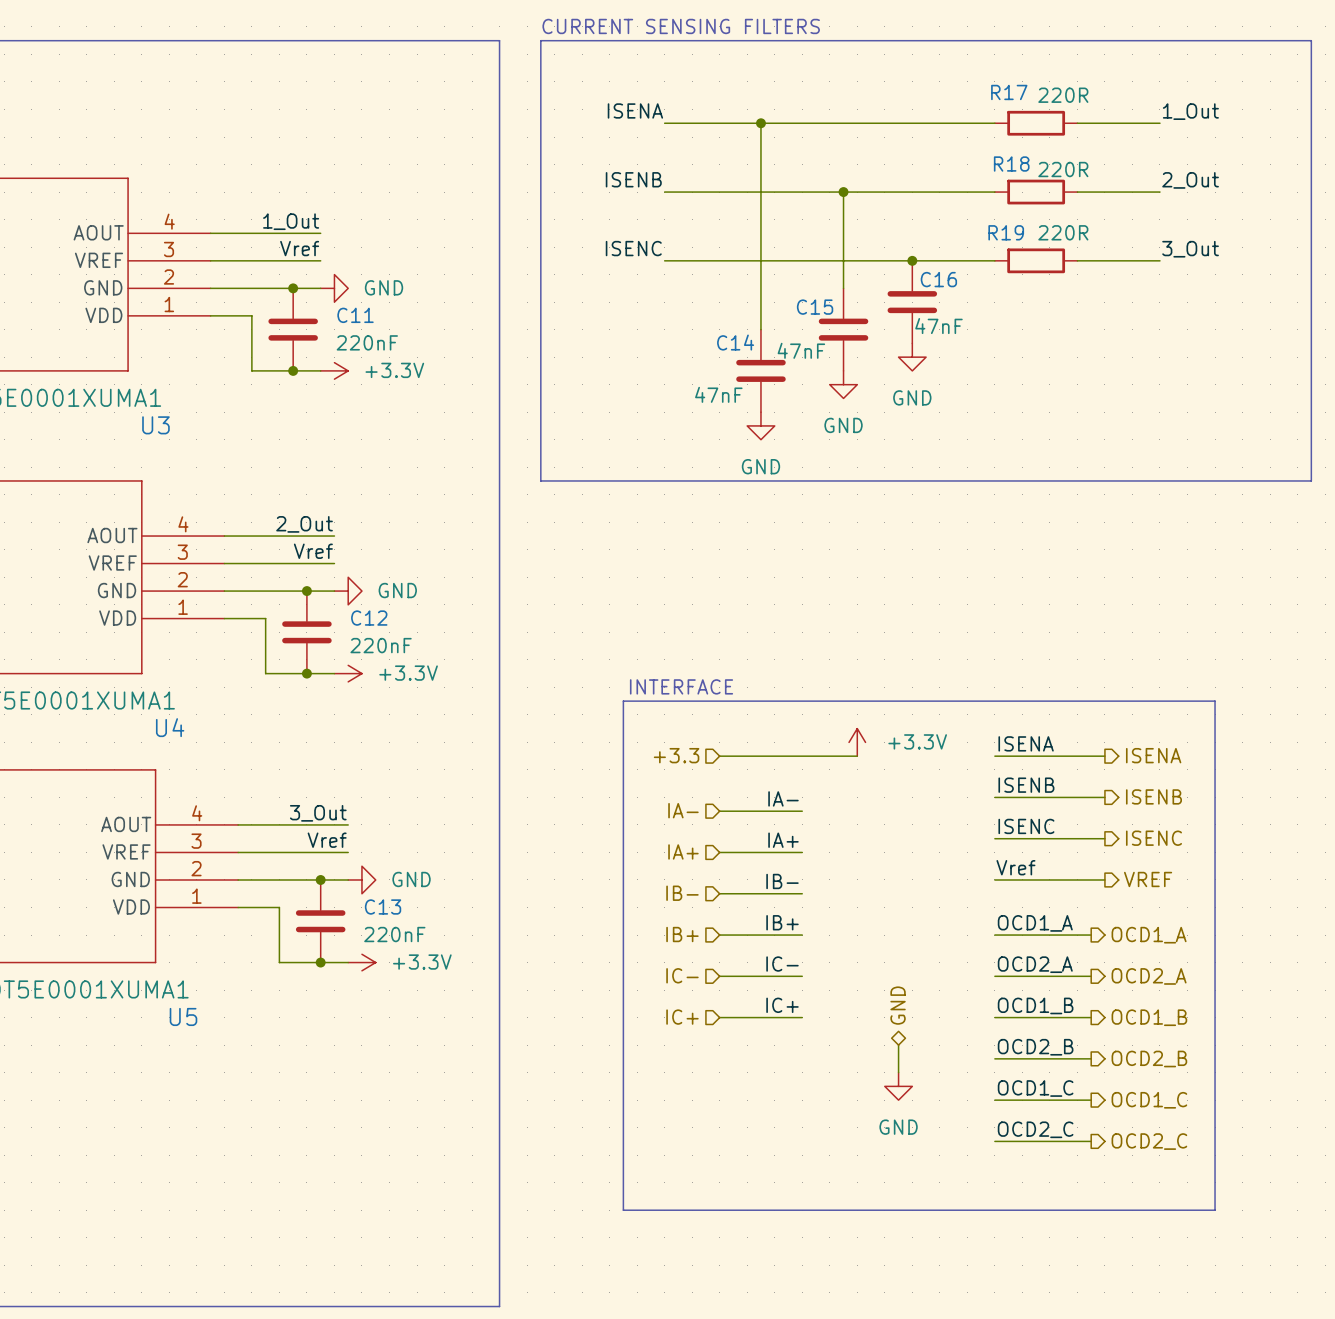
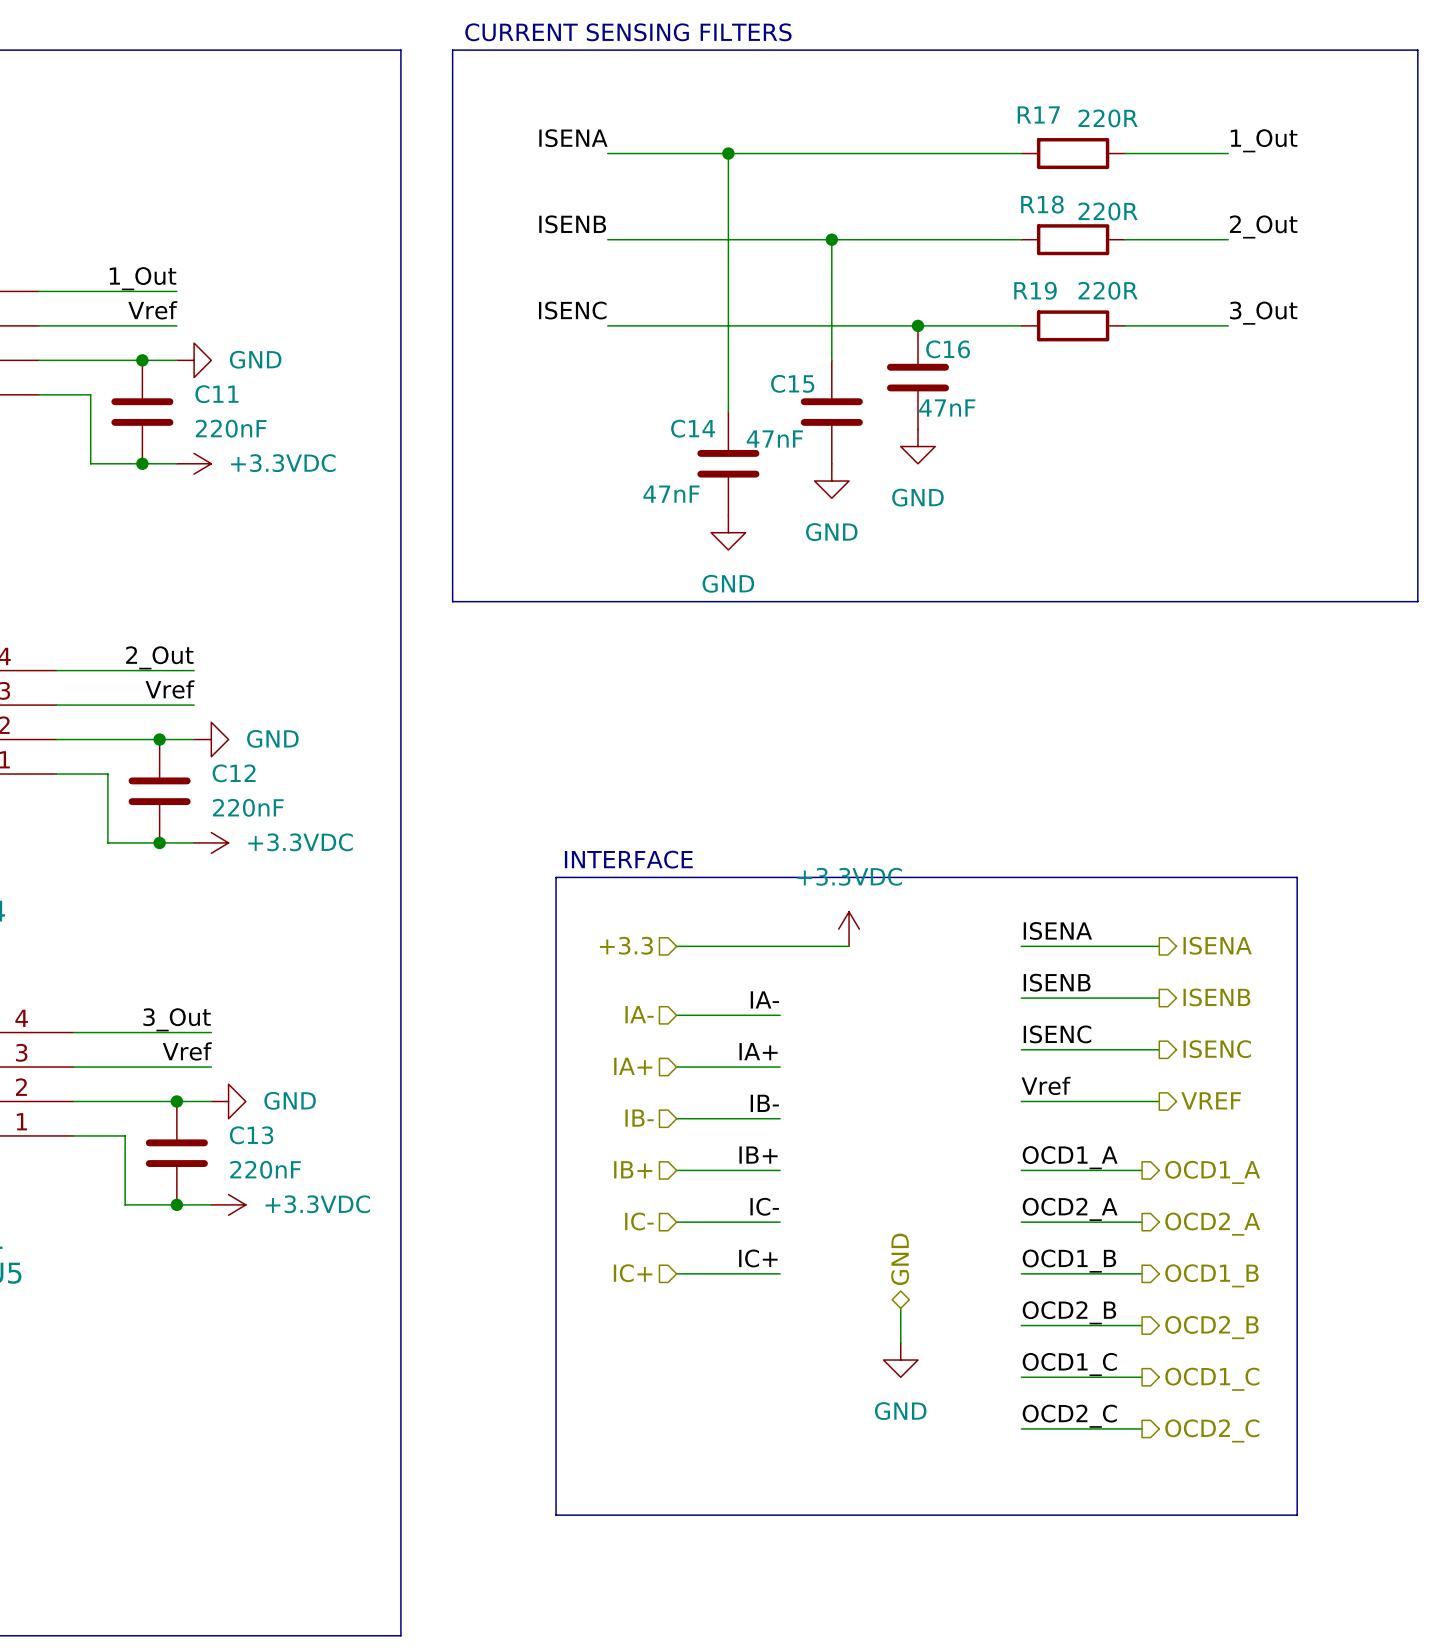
power symbol: +3.3V (334, 370) -> +3.3VDC (194, 463)
power symbol: +3.3V (348, 673) -> +3.3VDC (211, 842)
power symbol: +3.3V (857, 742) -> +3.3VDC (849, 929)
power symbol: +3.3V (361, 962) -> +3.3VDC (228, 1204)

